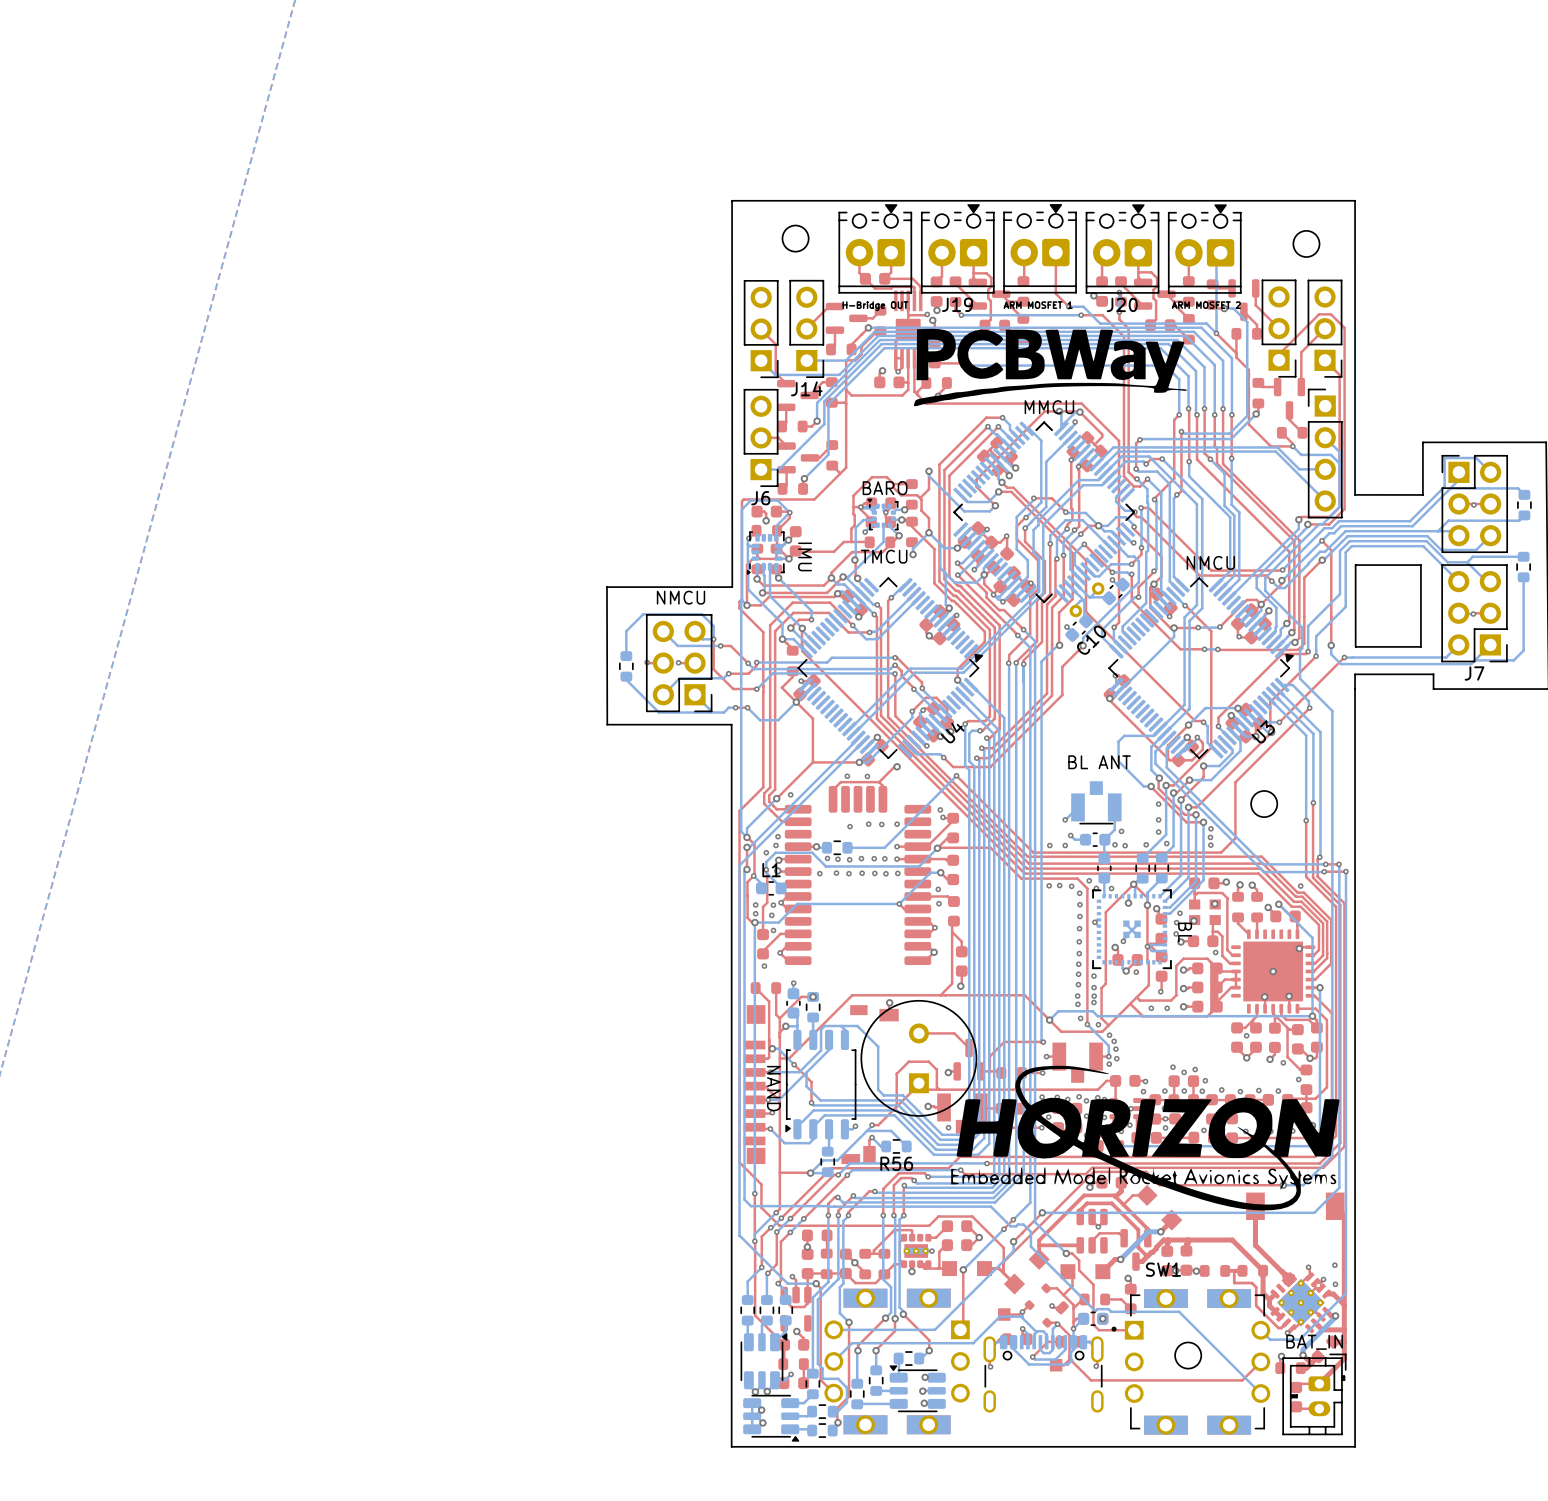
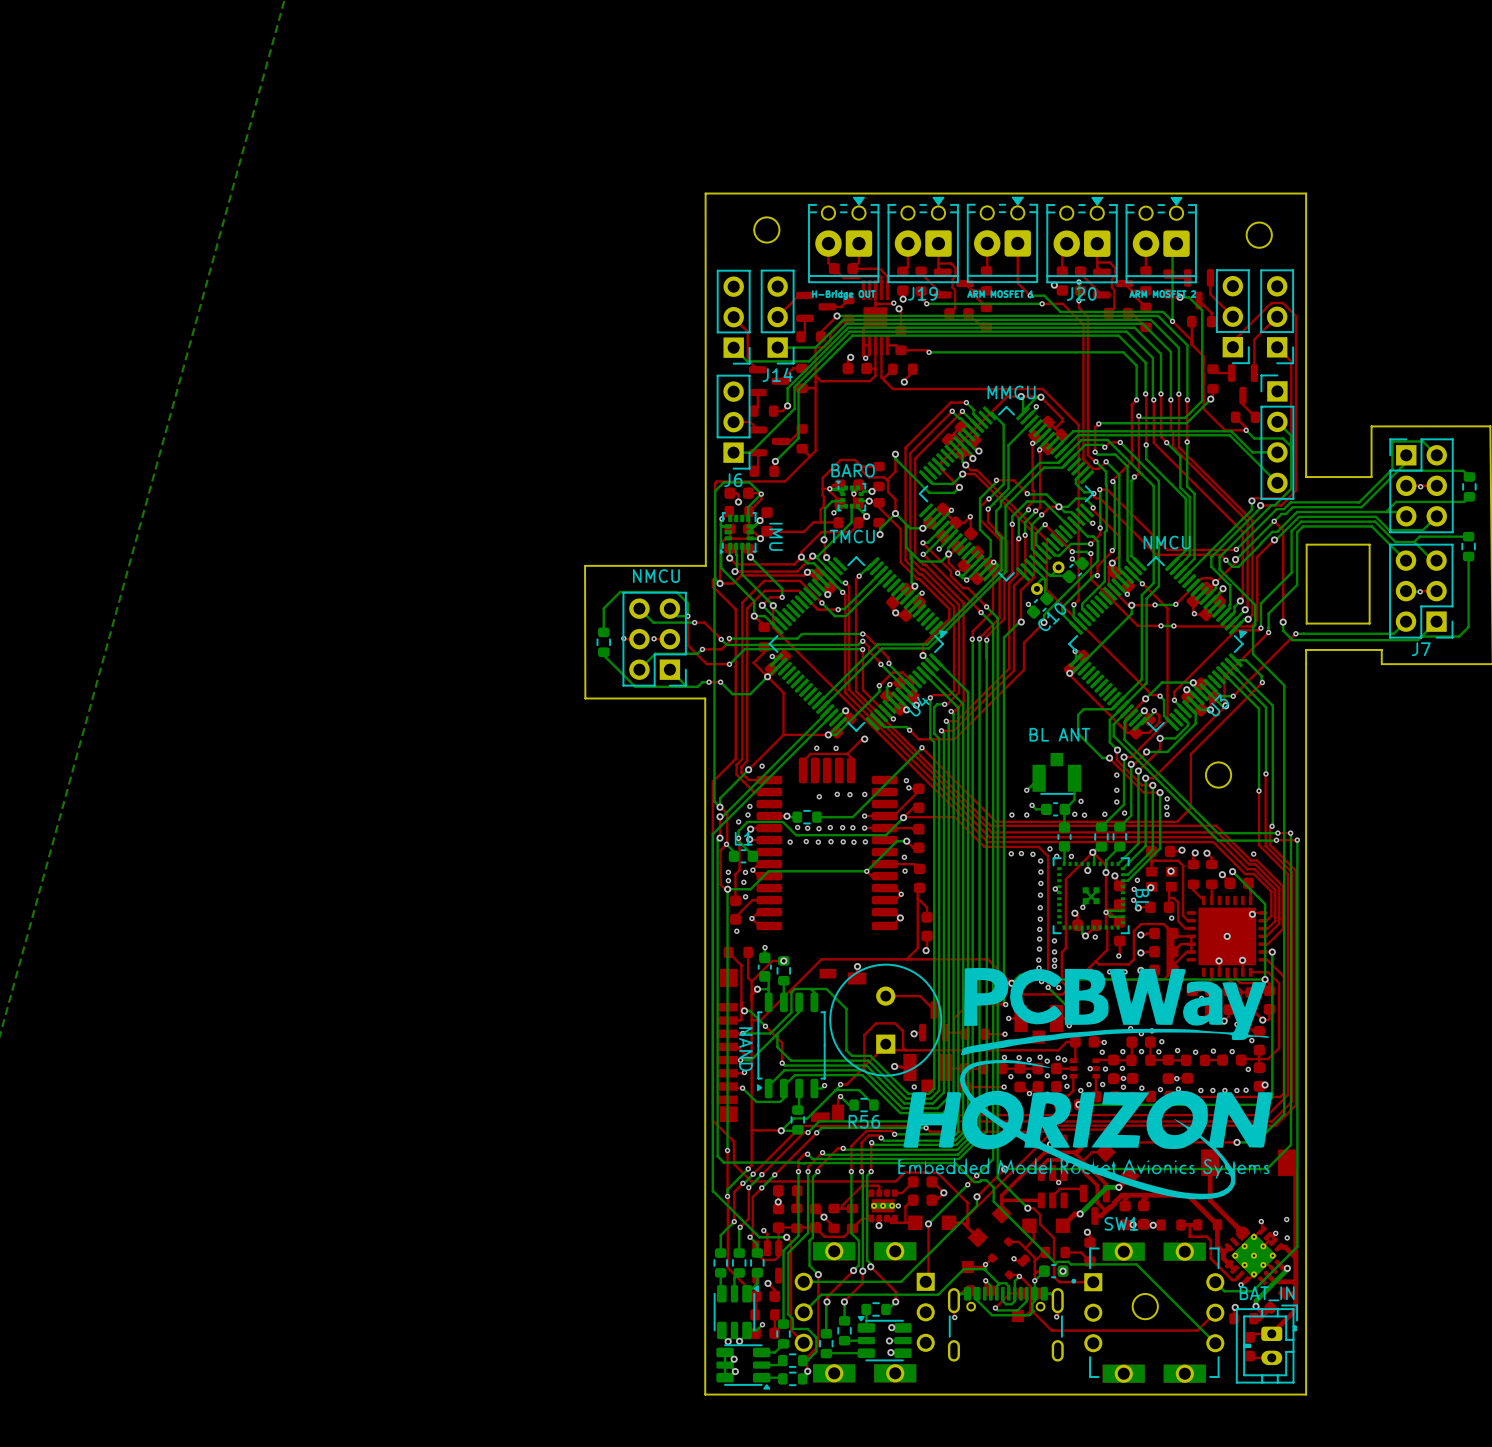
drawing: [913, 328, 1188, 407] -> none
drawing: none -> [961, 967, 1270, 1056]
drawing position: (1145, 1138) -> (1085, 1129)

